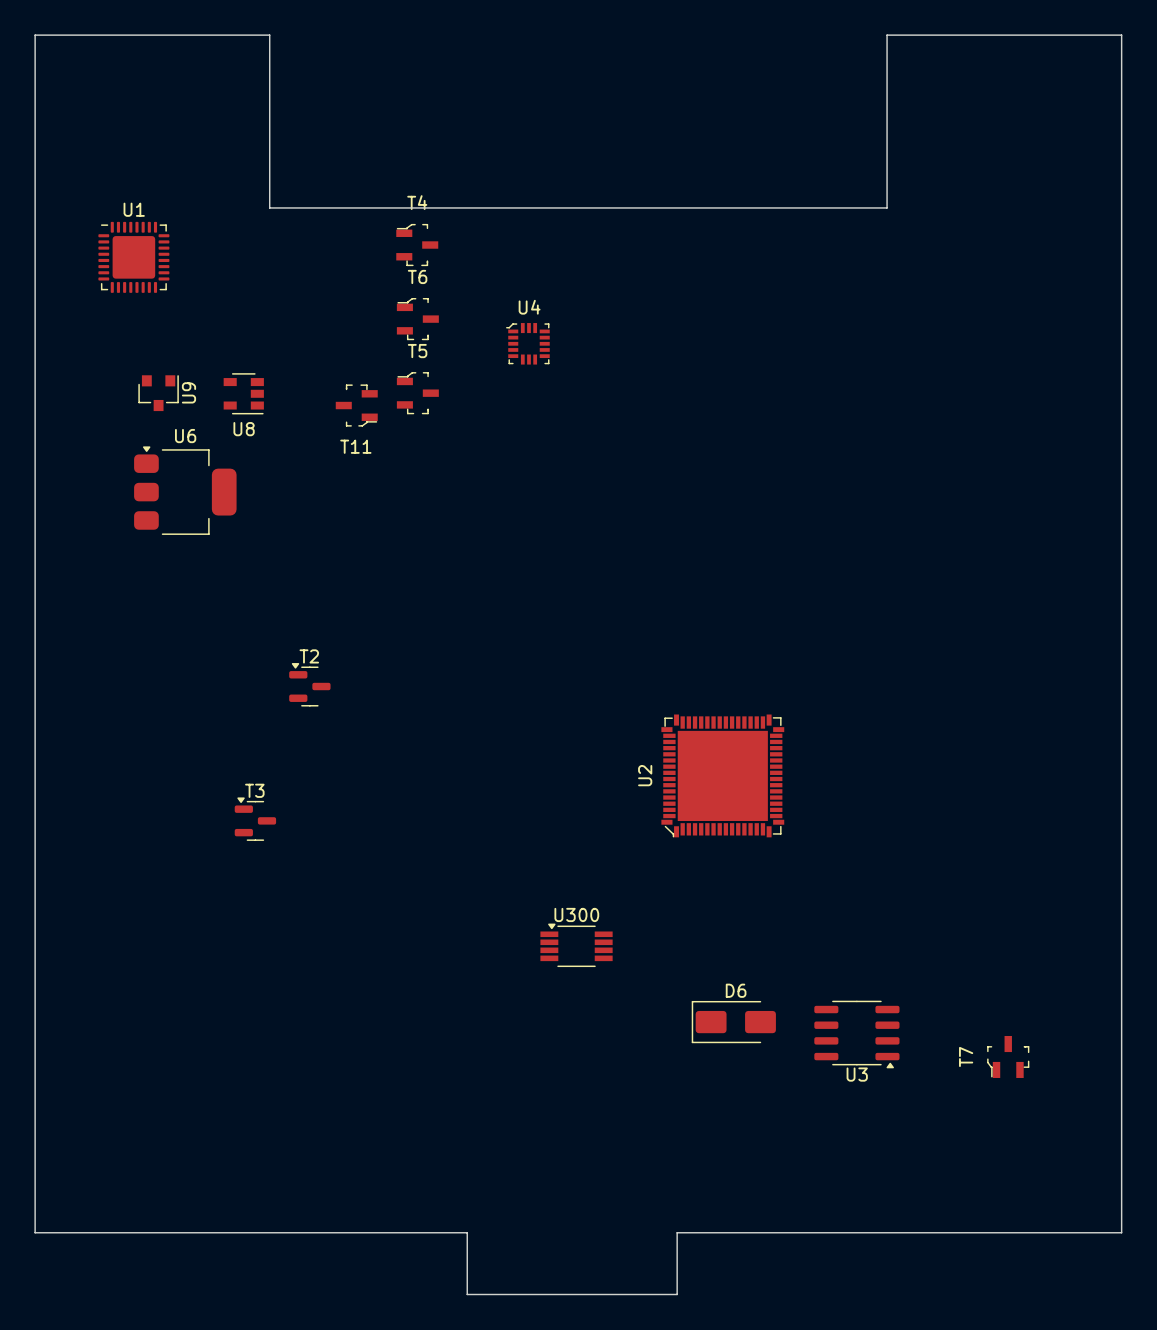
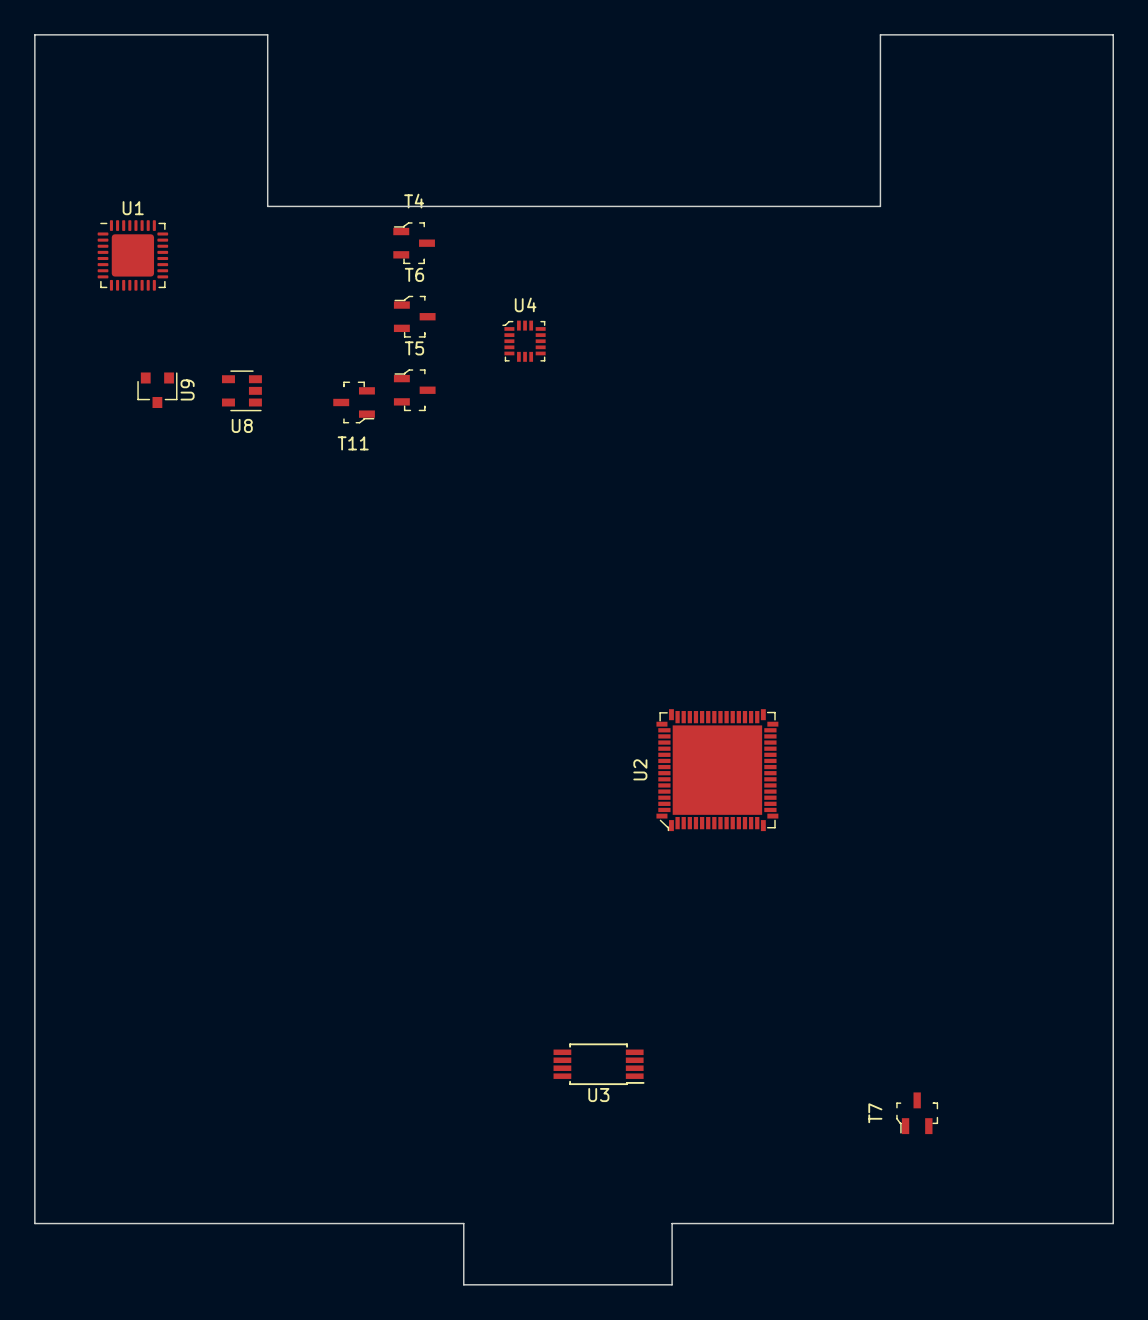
U6: (185, 490) -> none
T2: (309, 684) -> none
T3: (255, 819) -> none
U300: (576, 945) -> none
U3 footprint: [814, 1000, 900, 1069] -> [553, 1043, 645, 1086]
D6: (733, 1022) -> none
T7 position: (1008, 1056) -> (917, 1113)

